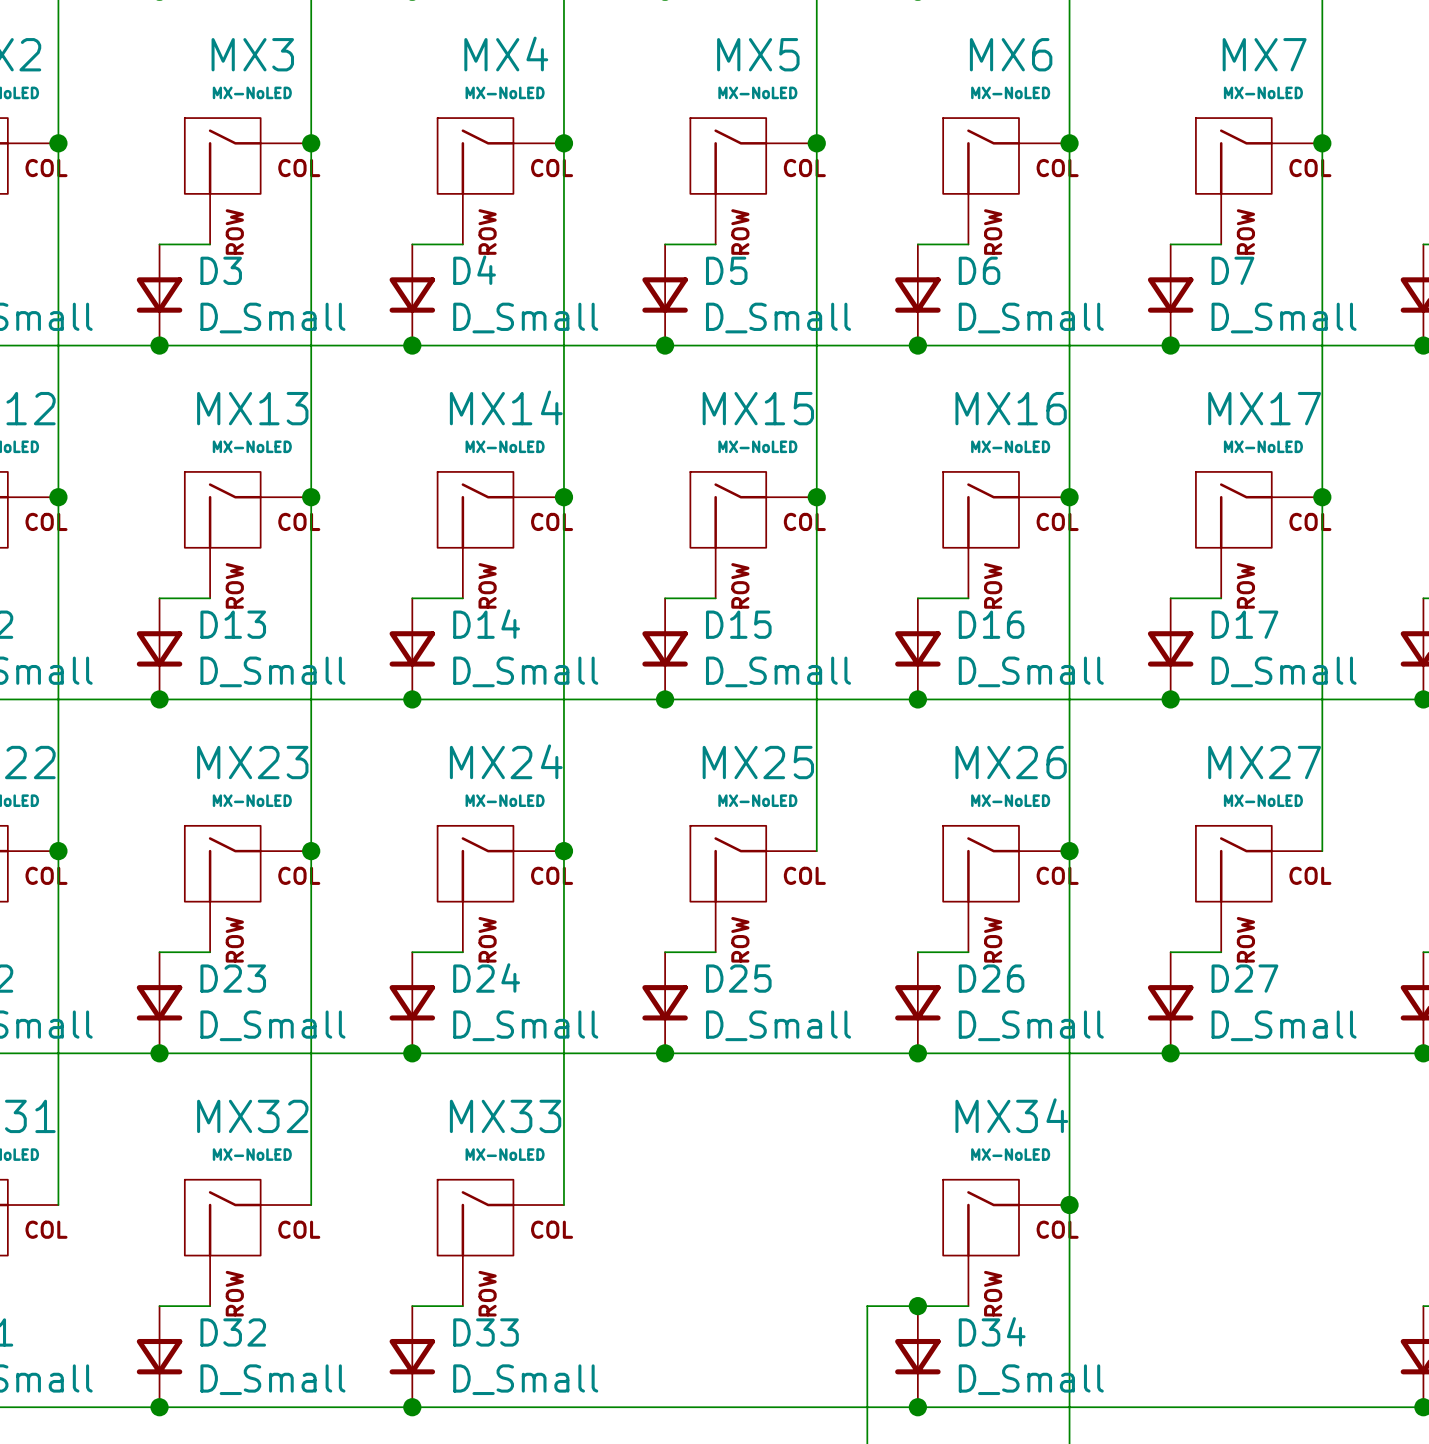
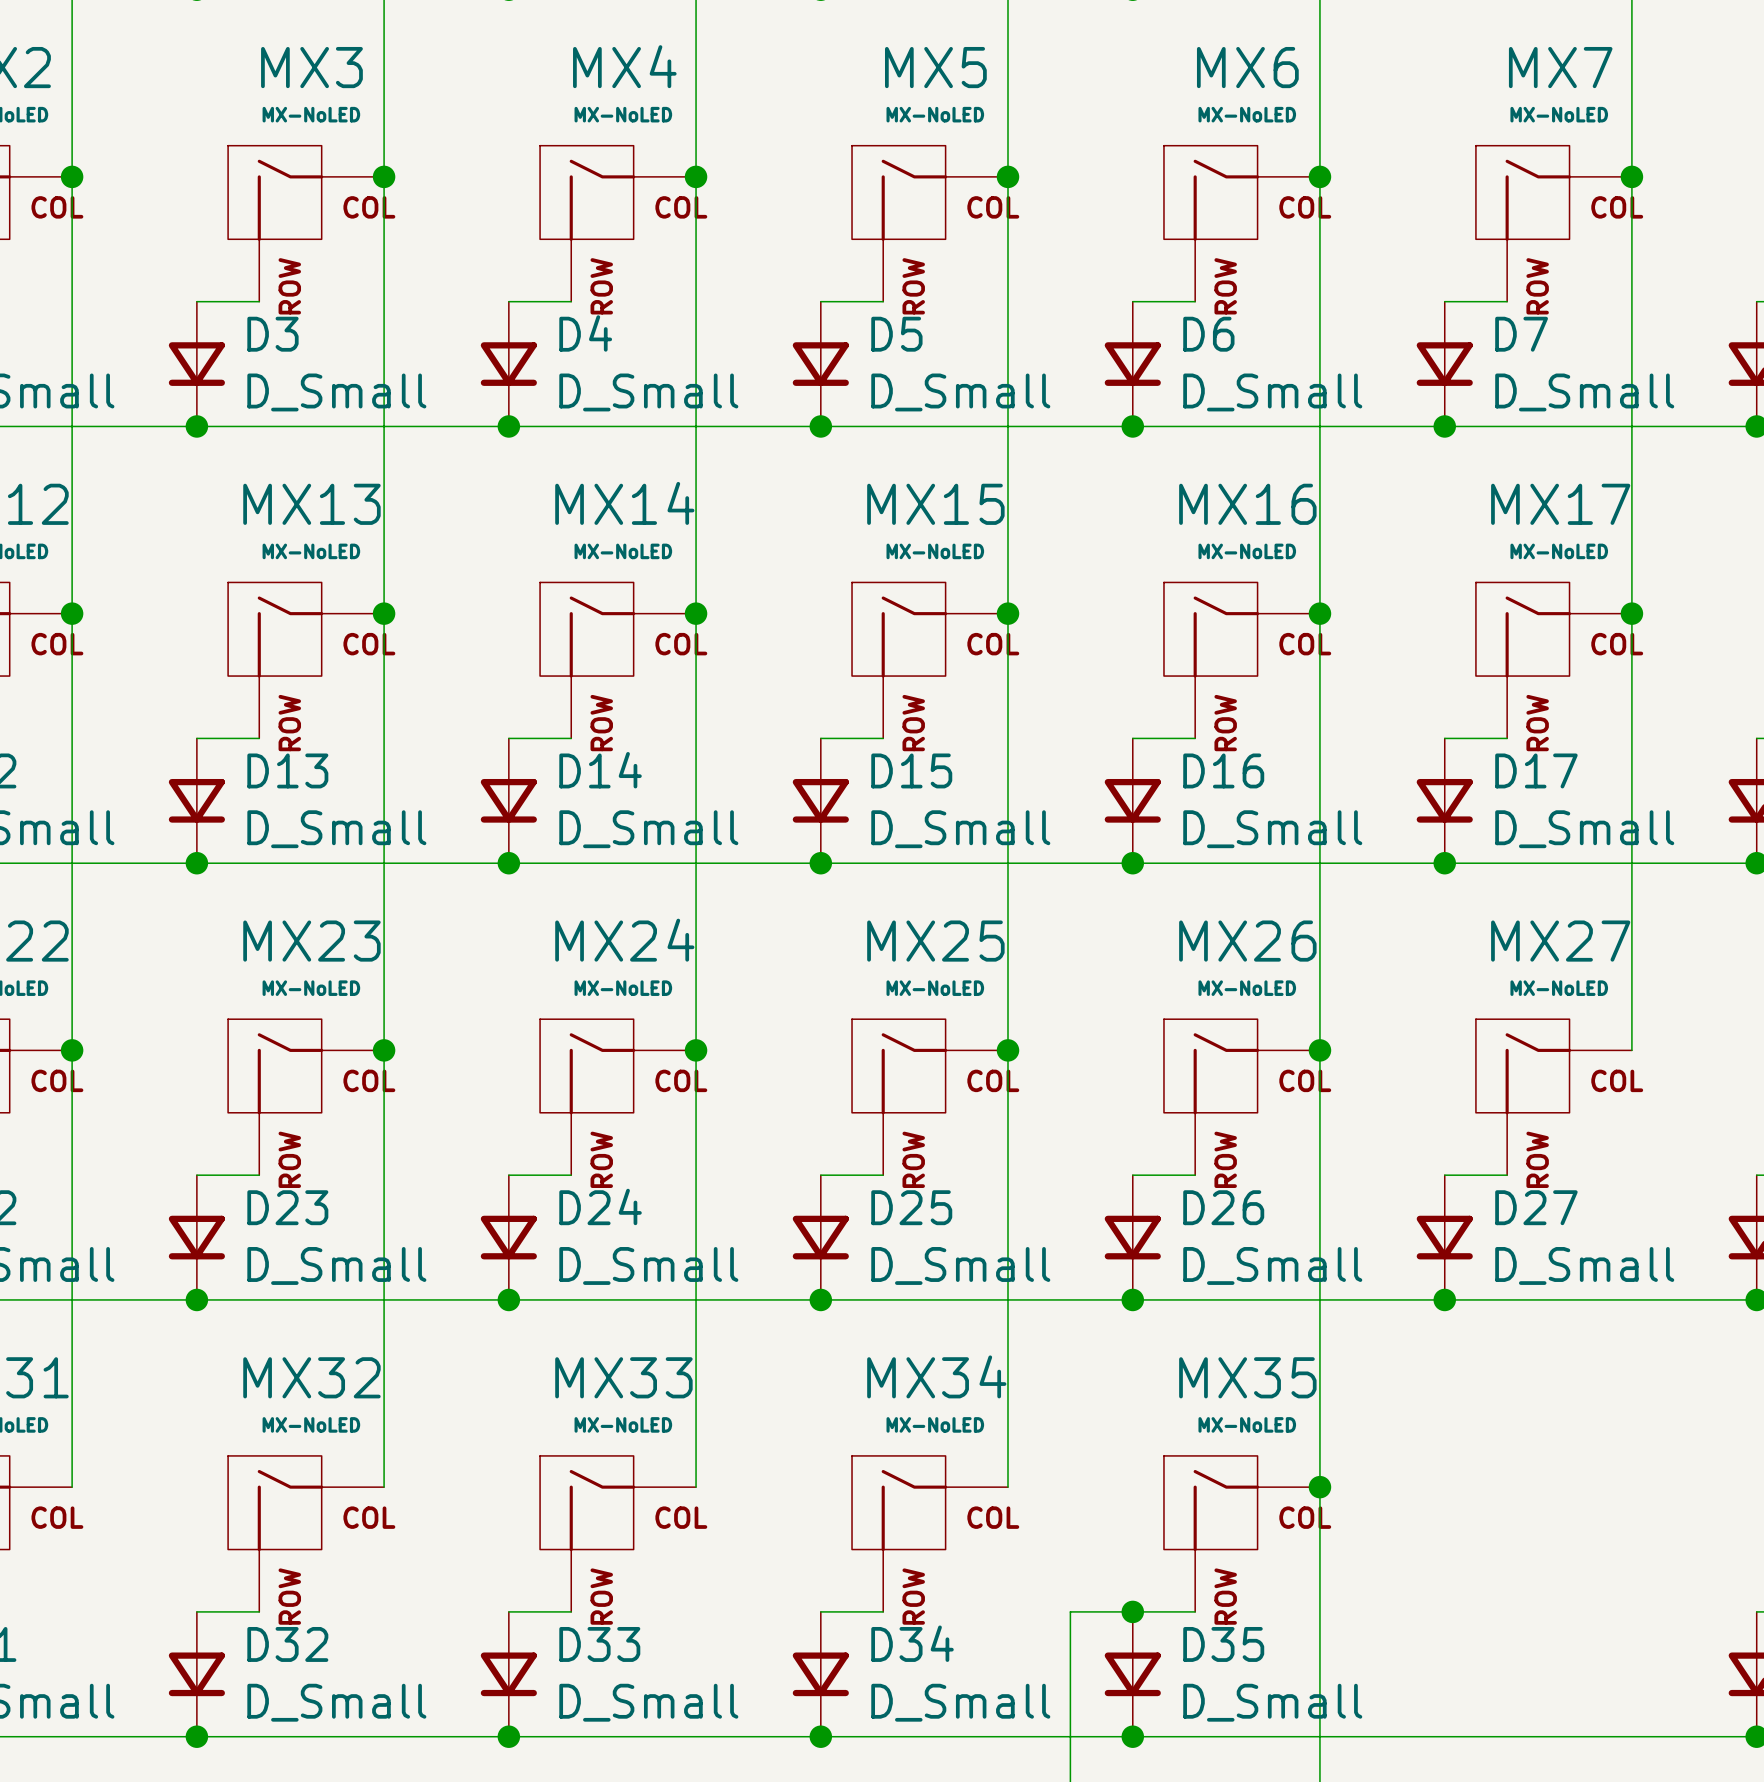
wire: none -> (1008, 1050) (1008, 1487)
junction: none -> (1008, 1050)
MX34 name: MX34 (1011, 1115) -> MX35 (1247, 1377)
MX34: none -> MX-NoLED (930, 1533)
wire: none -> (820, 1611) (883, 1611)
D34 name: D34 (992, 1331) -> D35 (1223, 1644)
D34: none -> D_Small (820, 1674)
junction: none -> (820, 1736)

